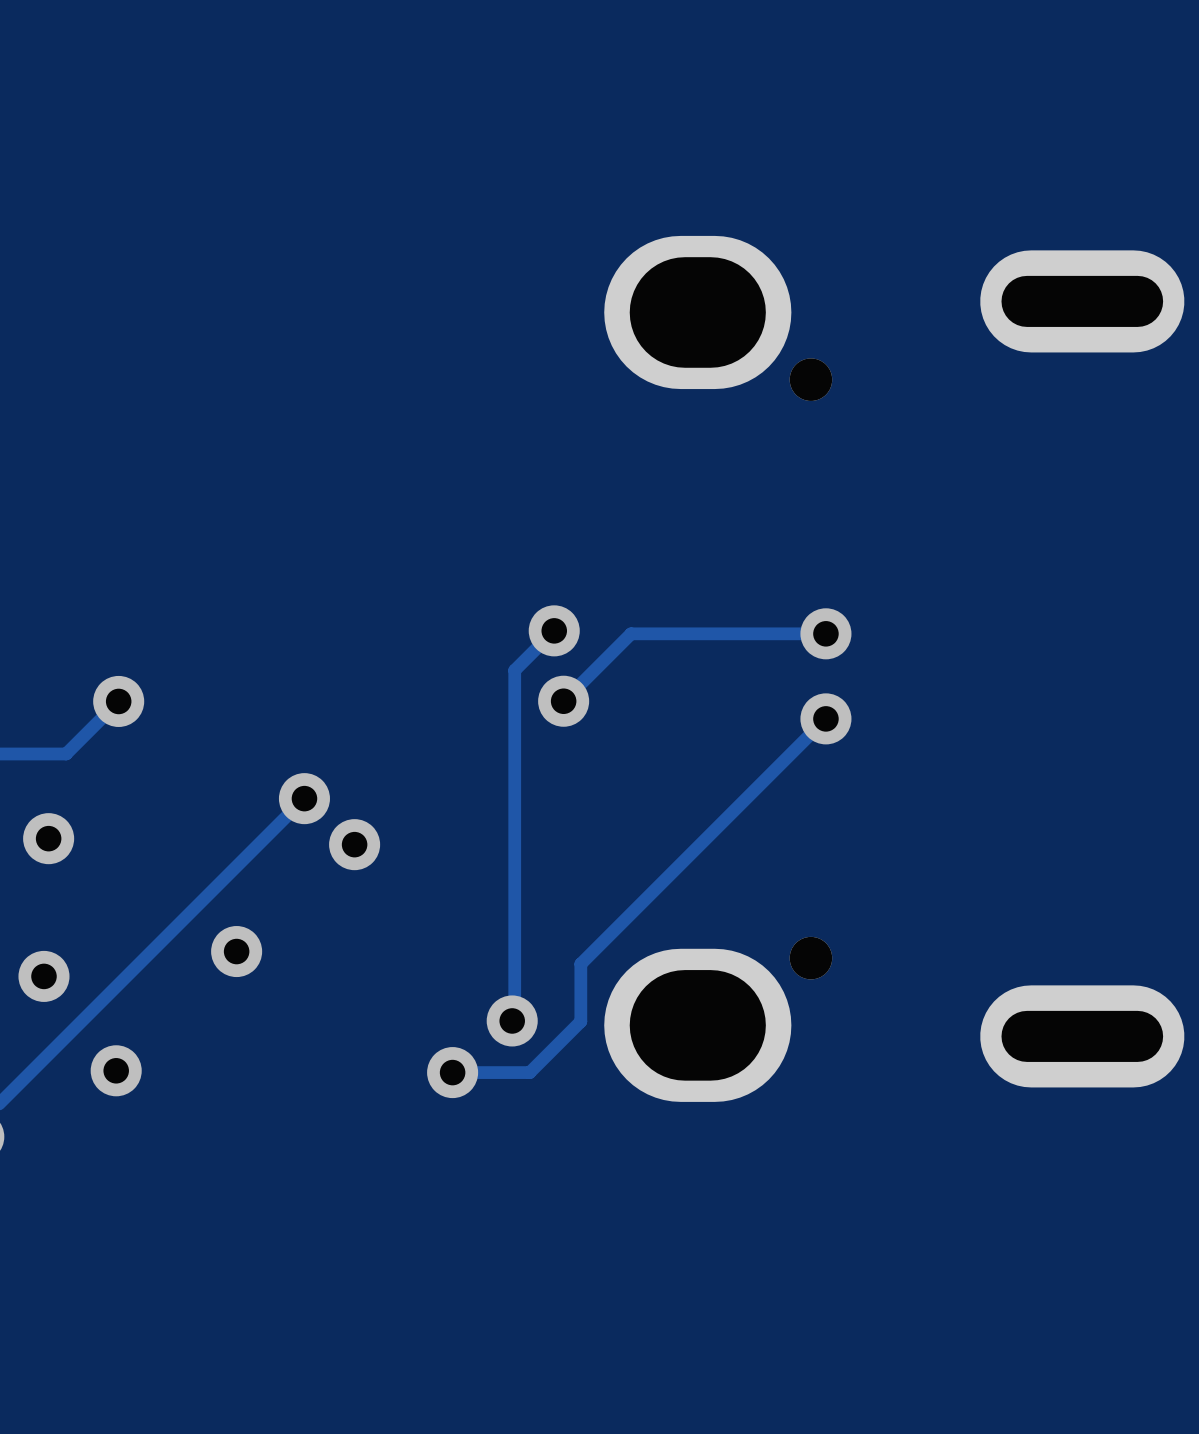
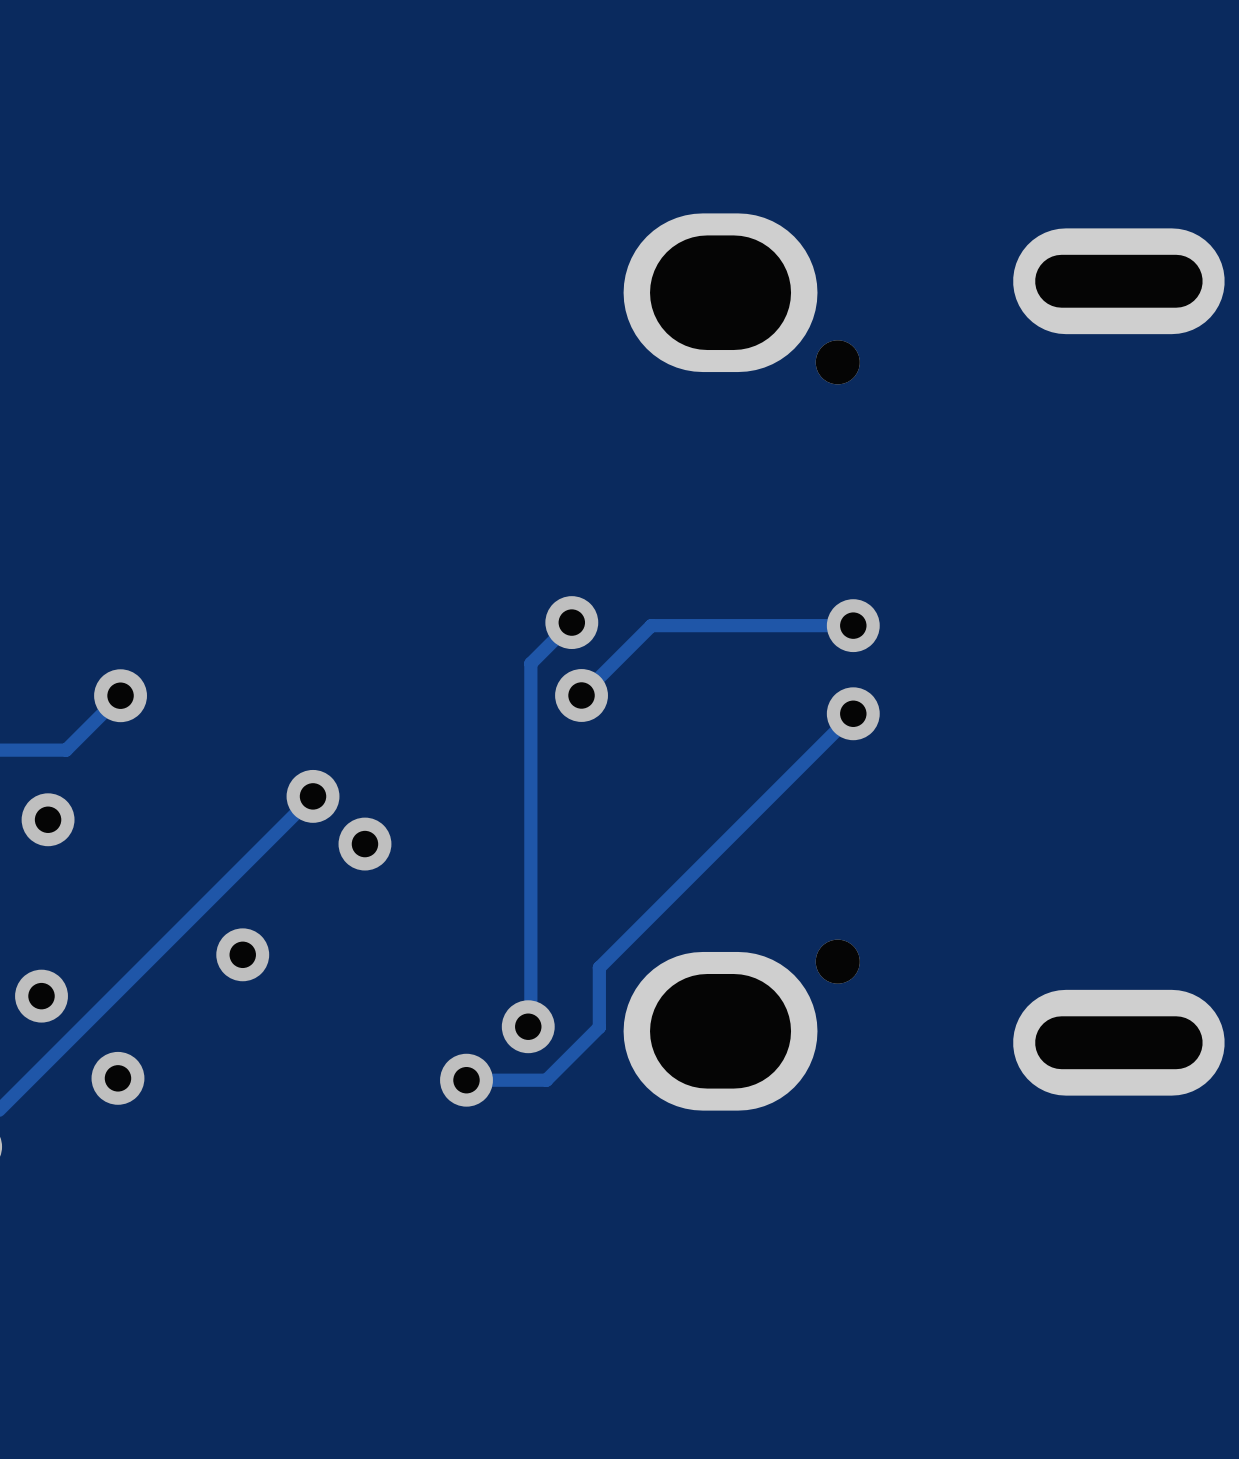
via position: (48, 838) -> (48, 819)
via position: (43, 976) -> (41, 996)

